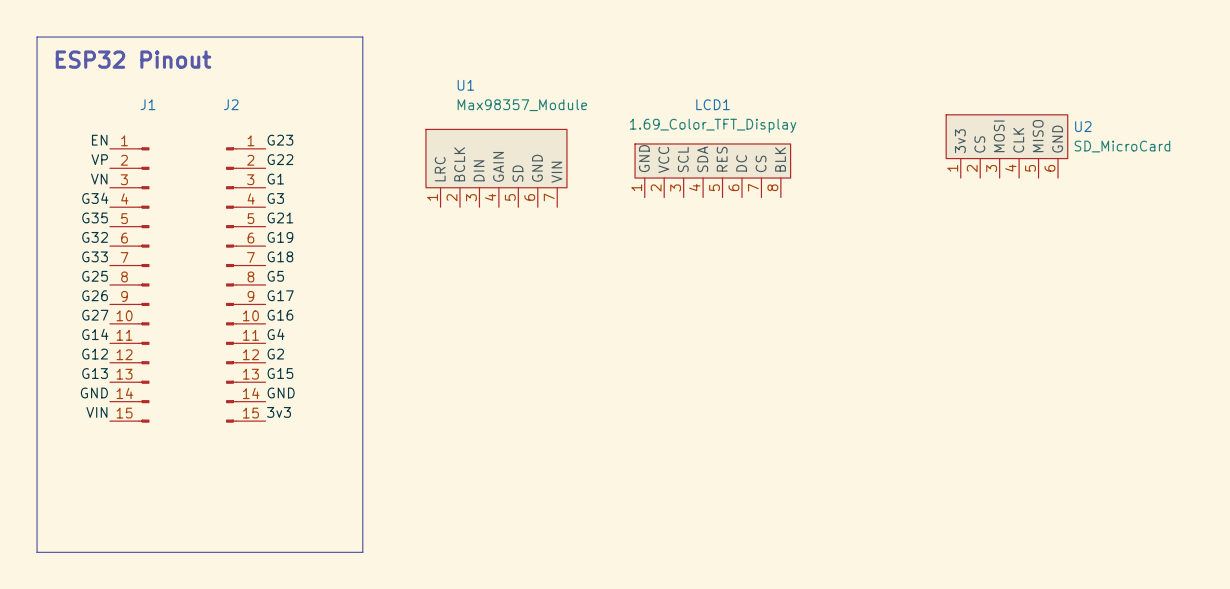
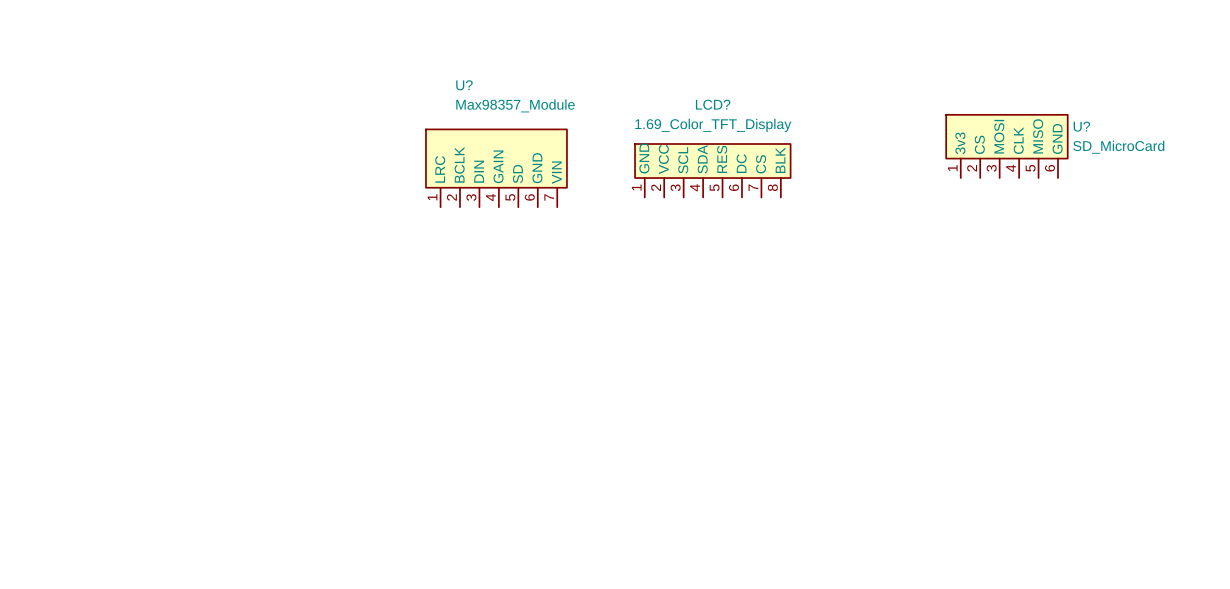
line: (37, 37) (362, 37) (362, 552) (37, 552) (37, 37) -> none
text: ESP32 Pinout (133, 59) -> none
U1 name: U1 (465, 85) -> U? (464, 85)
LCD1 name: LCD1 (713, 104) -> LCD? (713, 104)
U2 name: U2 (1083, 126) -> U? (1081, 126)
label: EN (99, 140) -> none
label: G23 (280, 140) -> none
label: VP (99, 159) -> none
label: G22 (280, 159) -> none
label: VN (99, 179) -> none
label: G1 (275, 179) -> none
label: G34 (95, 198) -> none
label: G3 (275, 198) -> none
label: G35 (95, 217) -> none
label: G21 (280, 217) -> none
label: G32 (95, 237) -> none
label: G19 (280, 237) -> none
label: G33 (95, 256) -> none
label: G18 (280, 256) -> none
label: G25 (95, 276) -> none
label: G5 (275, 276) -> none
J1: (129, 284) -> none
J2: (245, 284) -> none
label: G26 (95, 295) -> none
label: G17 (280, 295) -> none
label: G27 (95, 315) -> none
label: G16 (280, 315) -> none
label: G14 (95, 334) -> none
label: G4 (276, 334) -> none
label: G12 (95, 354) -> none
label: G2 (275, 354) -> none
label: G13 (95, 373) -> none
label: G15 (280, 373) -> none
label: GND (94, 392) -> none
label: GND (281, 392) -> none
label: VIN (96, 412) -> none
label: 3v3 (279, 412) -> none

